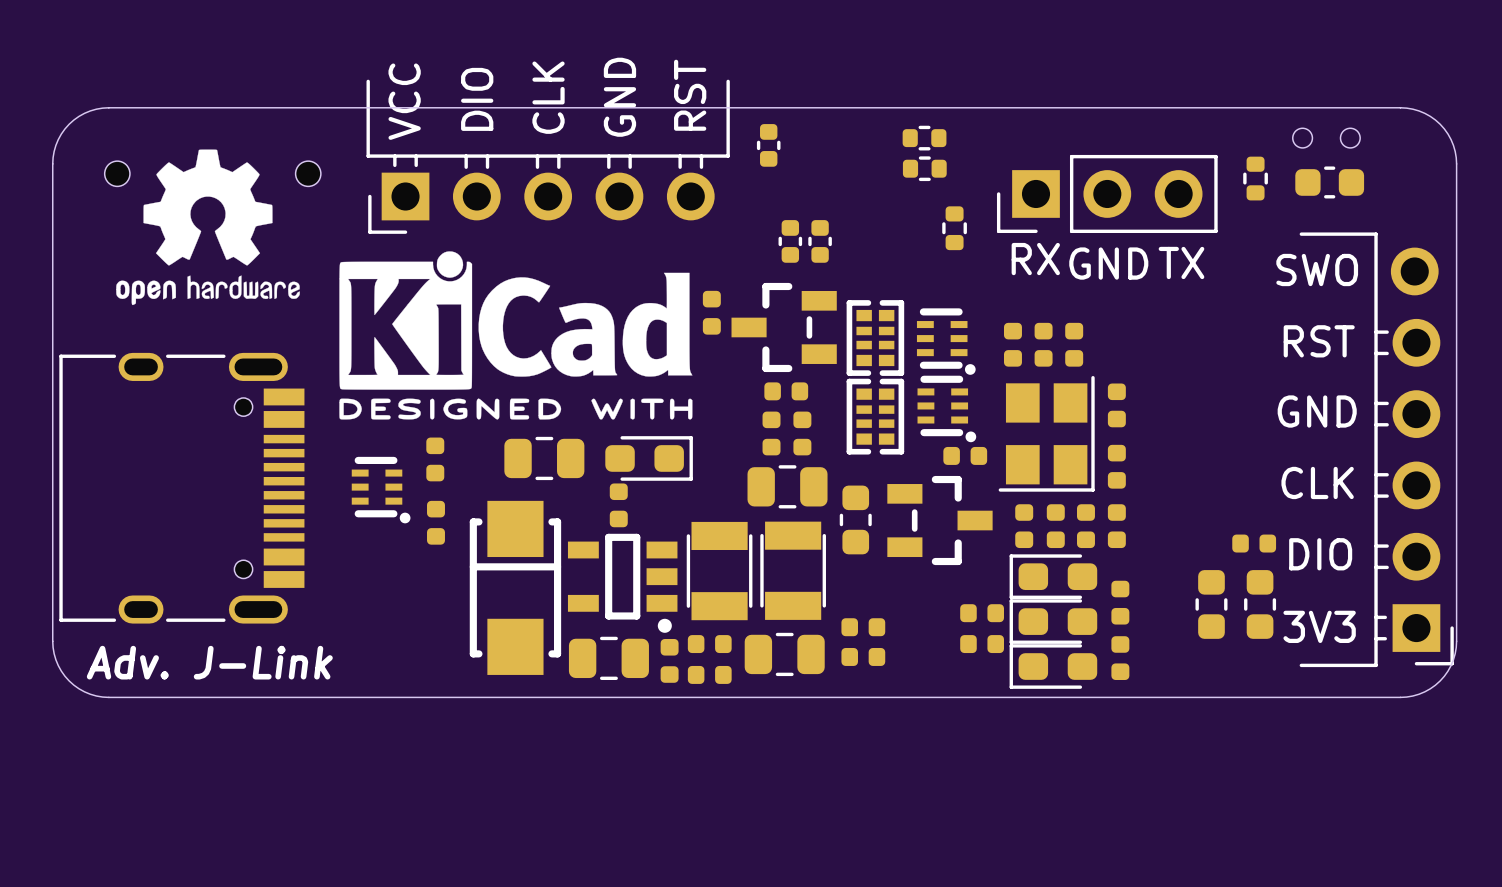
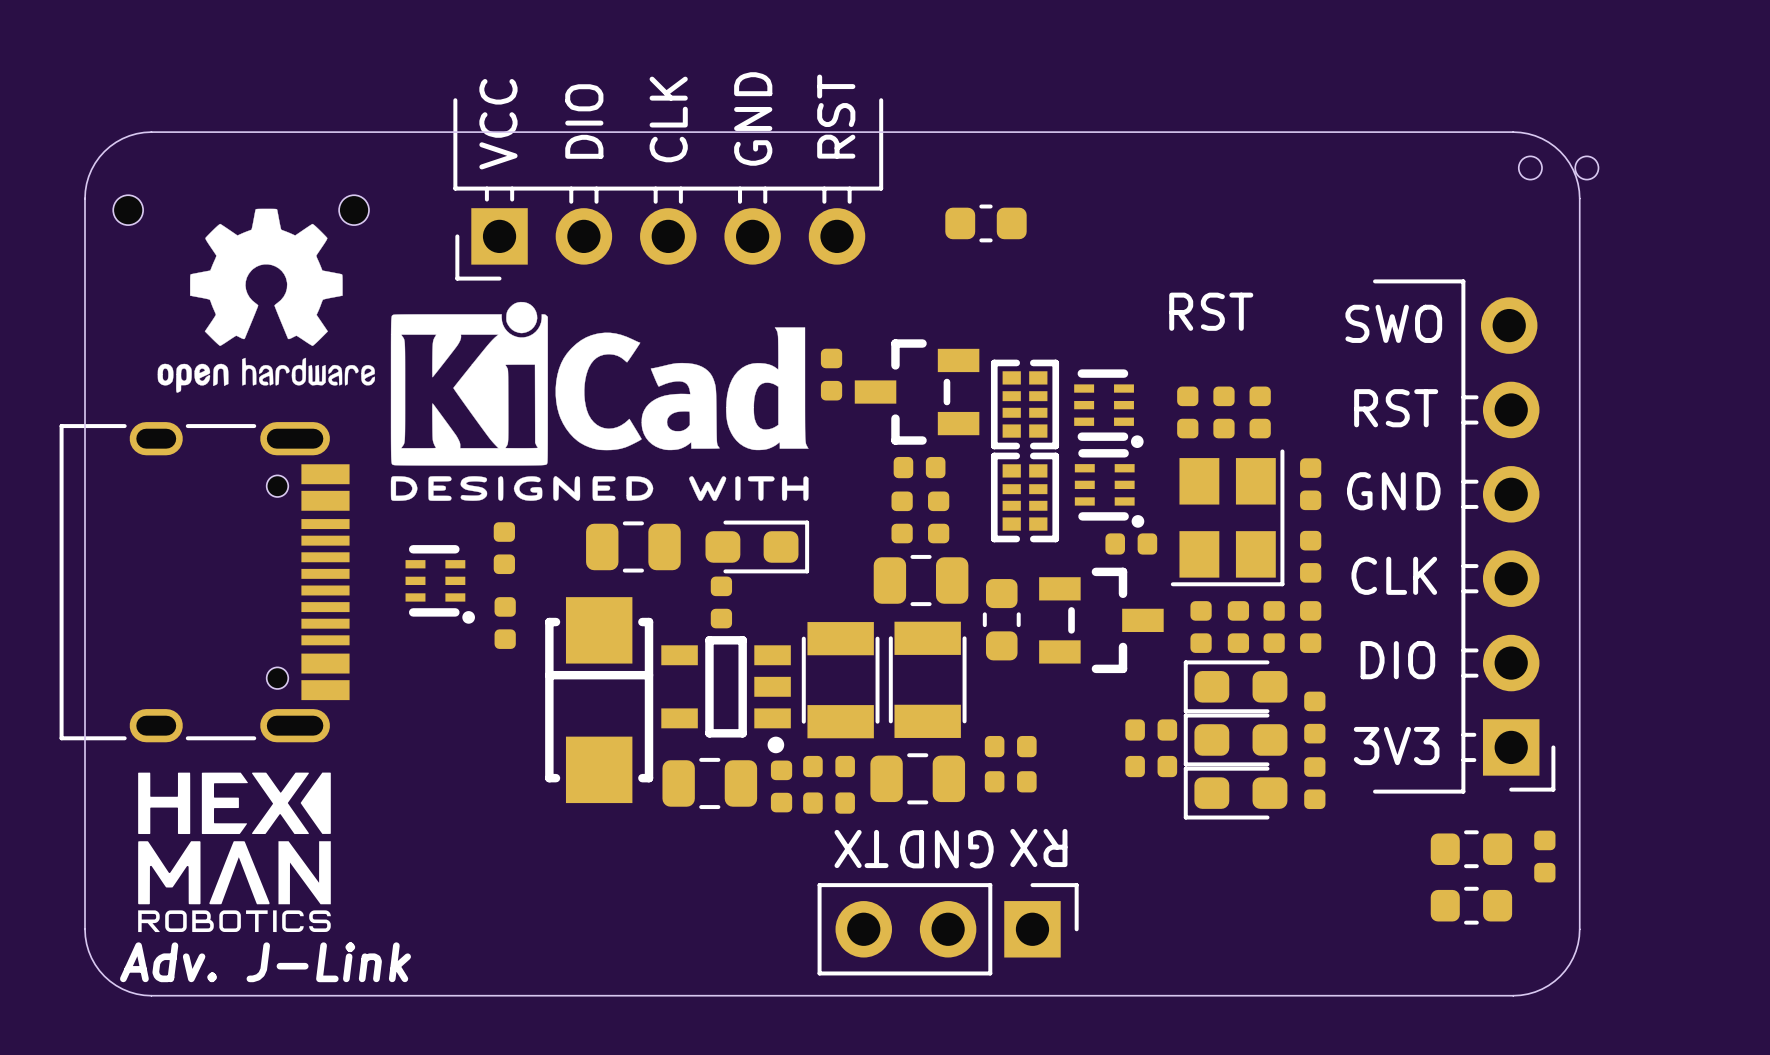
board edge: (136, 107) (102, 108) (79, 116) (61, 134) (53, 157) (53, 647) (55, 659) (64, 676) (84, 691) (108, 697) (1412, 695) (1430, 688) (1444, 676) (1451, 665) (1456, 647) (1455, 151) (1447, 134) (1440, 124) (1424, 113) (1412, 109) (1288, 107) -> (151, 132) (136, 133) (122, 138) (104, 151) (95, 163) (88, 176) (85, 198) (85, 936) (91, 958) (104, 976) (122, 989) (136, 994) (151, 995) (1513, 995) (1528, 994) (1548, 985) (1560, 976) (1569, 964) (1575, 951) (1579, 929) (1579, 198) (1578, 183) (1573, 169) (1560, 151) (1548, 142) (1535, 135) (1513, 132)
part: (924, 138) -> none
part: (768, 145) -> none
part position: (548, 156) -> (668, 189)
part: (924, 168) -> none
part: (1255, 178) -> none
part position: (1329, 182) -> (985, 223)
part rotation: 0° (1107, 193) -> 180° (948, 929)
part position: (1107, 193) -> (948, 929)
drawing position: (208, 227) -> (266, 300)
part: (954, 228) -> none
part: (790, 241) -> none
part: (820, 241) -> none
text: none -> RST (1211, 311)
text rotation: 0° (1035, 259) -> 180° (1038, 847)
text position: RX (1035, 259) -> RX (1038, 847)
text rotation: 0° (1181, 262) -> 180° (861, 848)
text position: TX (1181, 262) -> TX (861, 848)
text rotation: 0° (1108, 263) -> 180° (946, 849)
text position: GND (1108, 263) -> GND (946, 849)
part position: (1376, 449) -> (1464, 536)
part rotation: 0° (1254, 543) -> 90° clockwise (1544, 856)
part position: (1254, 543) -> (1544, 856)
part: (1211, 604) -> none
part: (1260, 604) -> none
drawing: none -> [138, 772, 331, 933]
text position: Adv. J-Link (209, 662) -> Adv. J-Link (265, 962)
part: none -> (1471, 849)
part: none -> (1471, 905)

